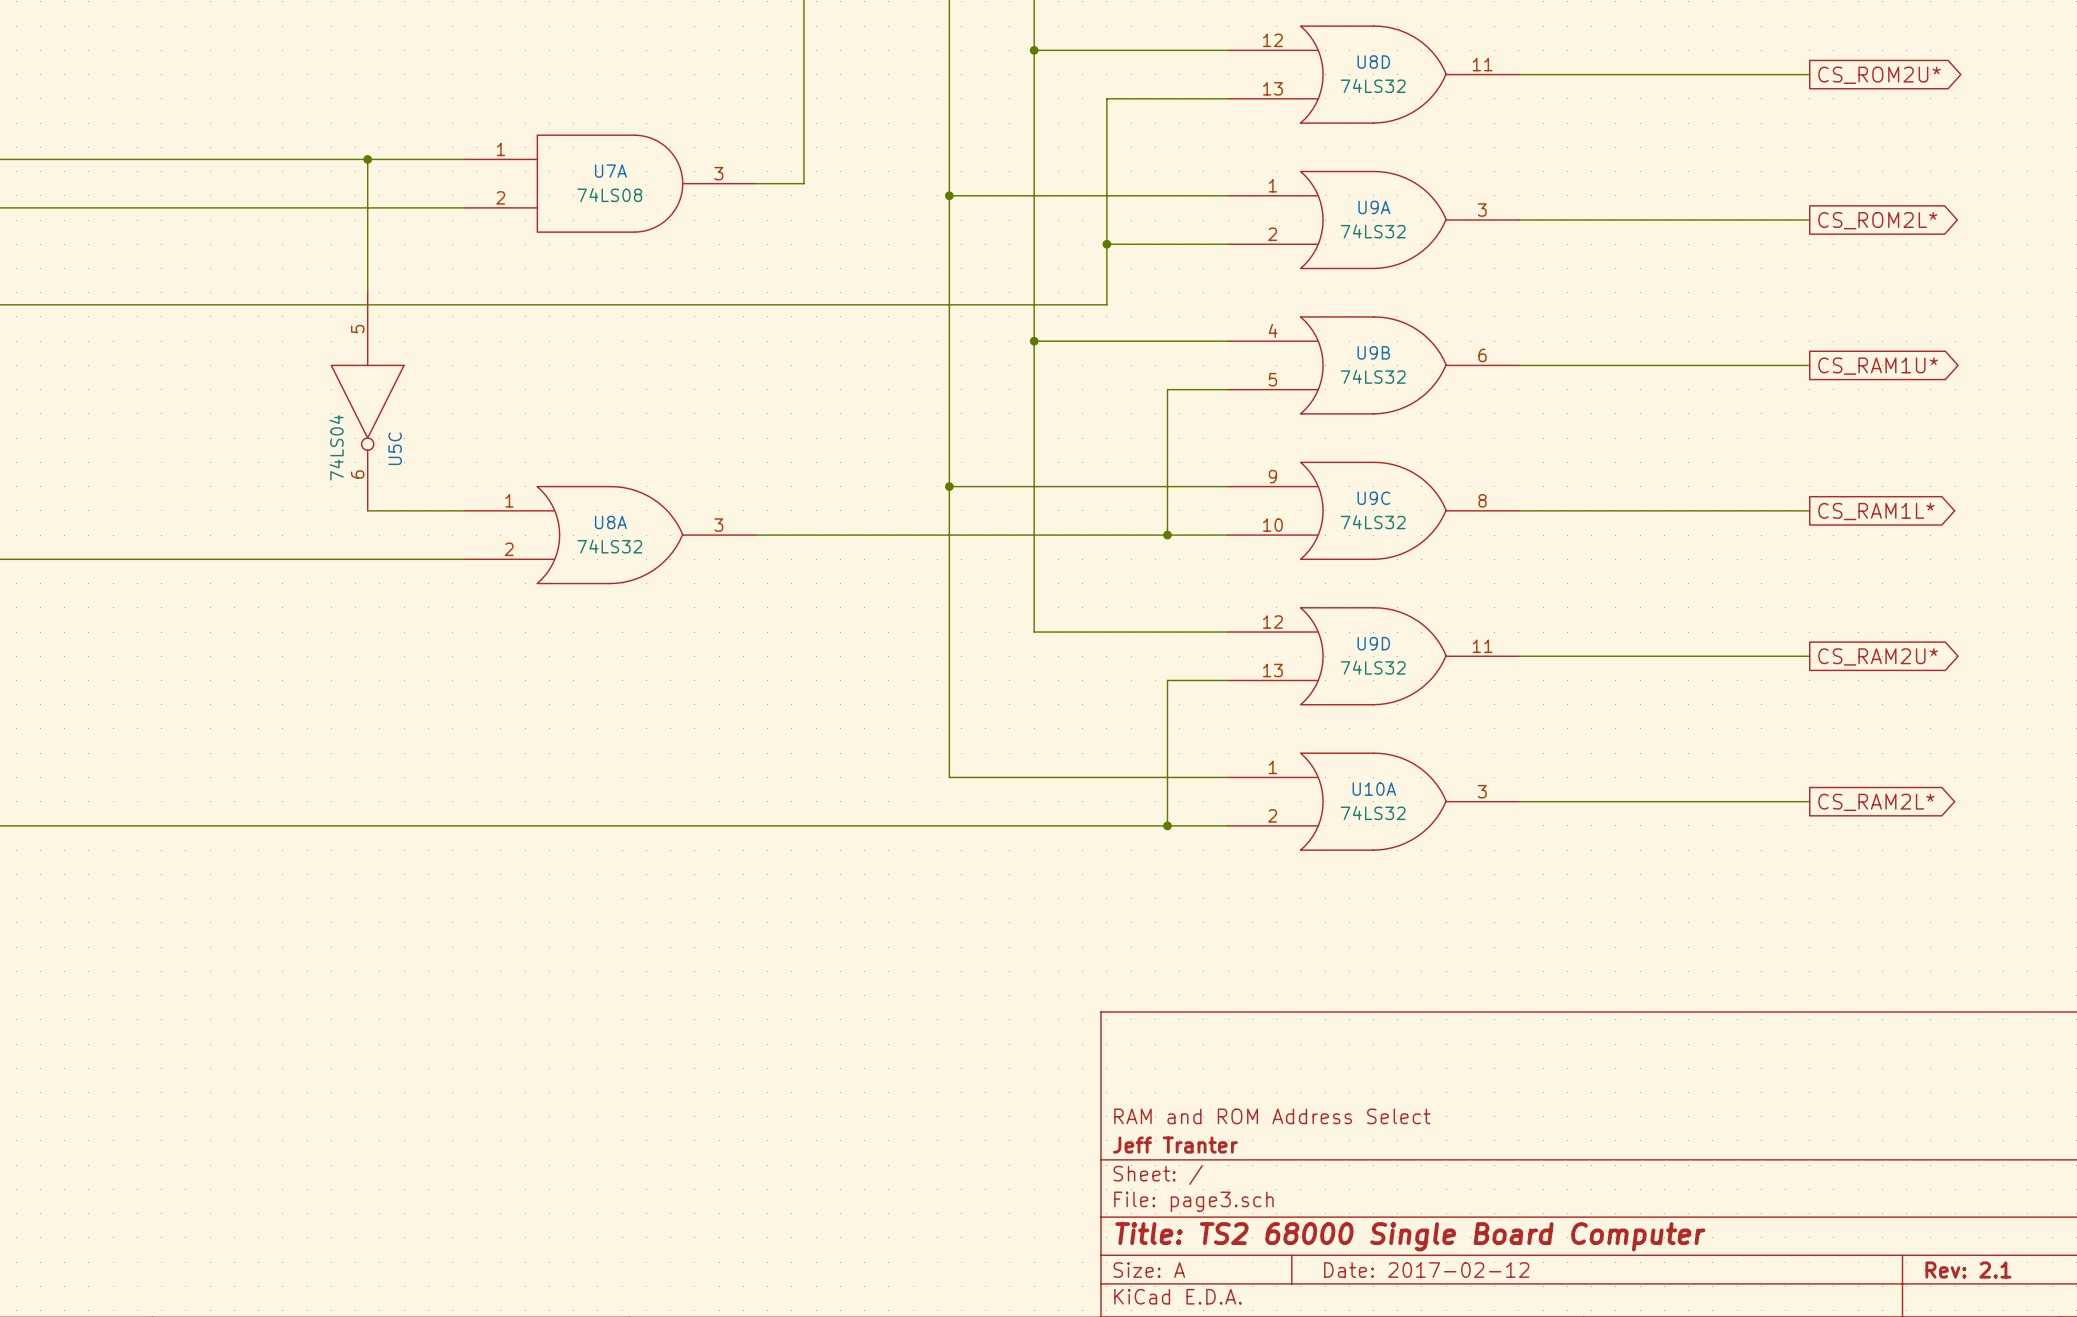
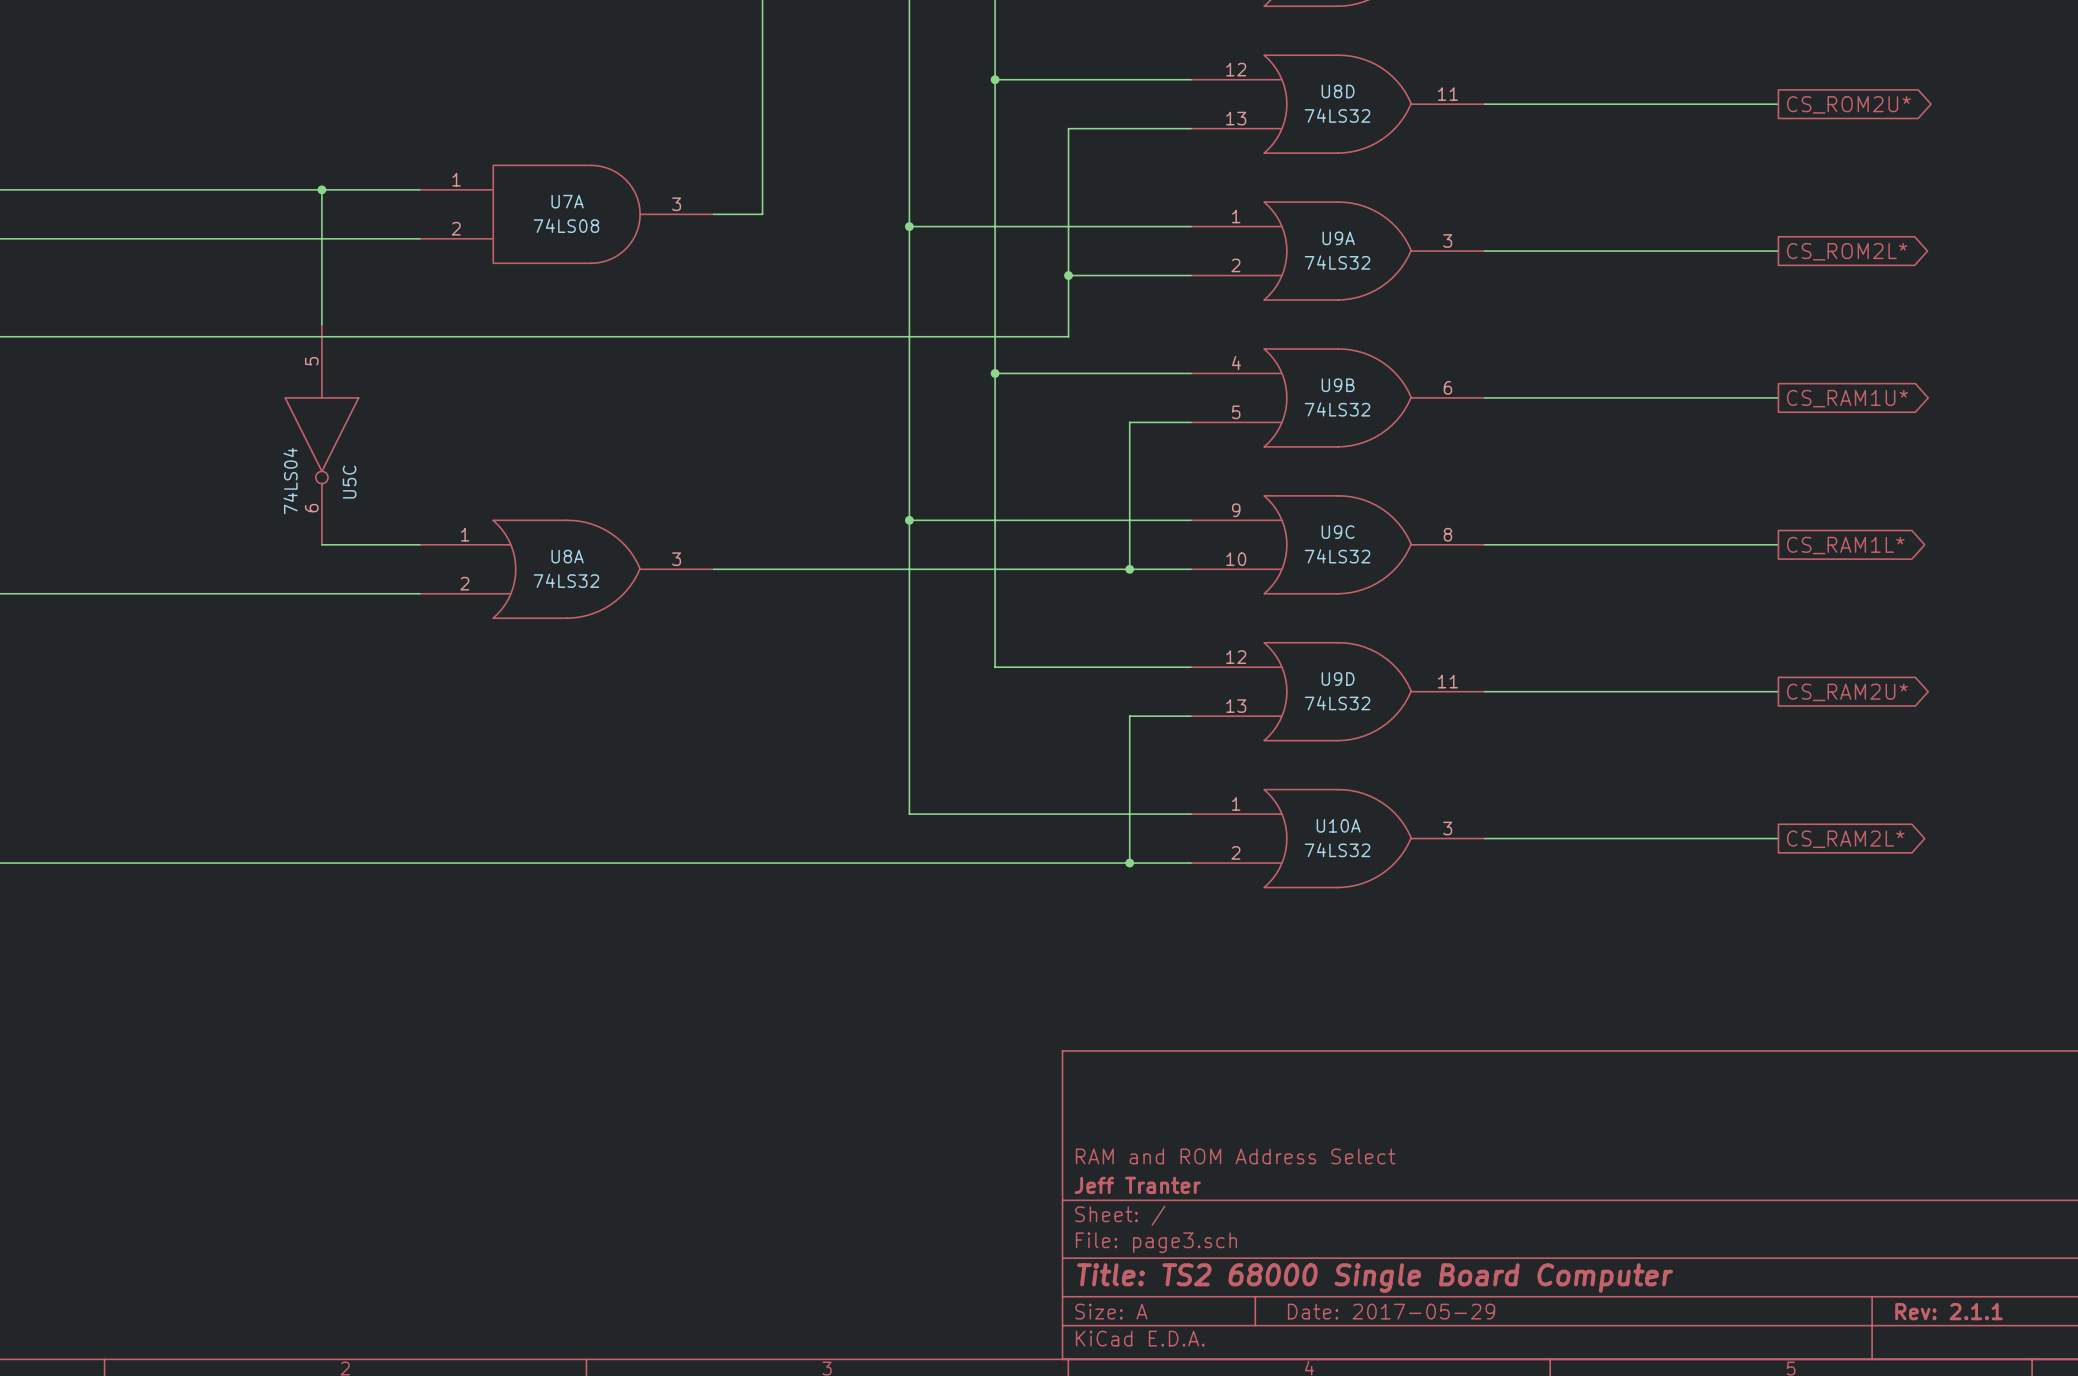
title block: Date: 2017-02-12 (1426, 1270) -> Date: 2017-05-29 (1391, 1311)
title block: Rev: 2.1 (1968, 1270) -> Rev: 2.1.1 (1949, 1311)

